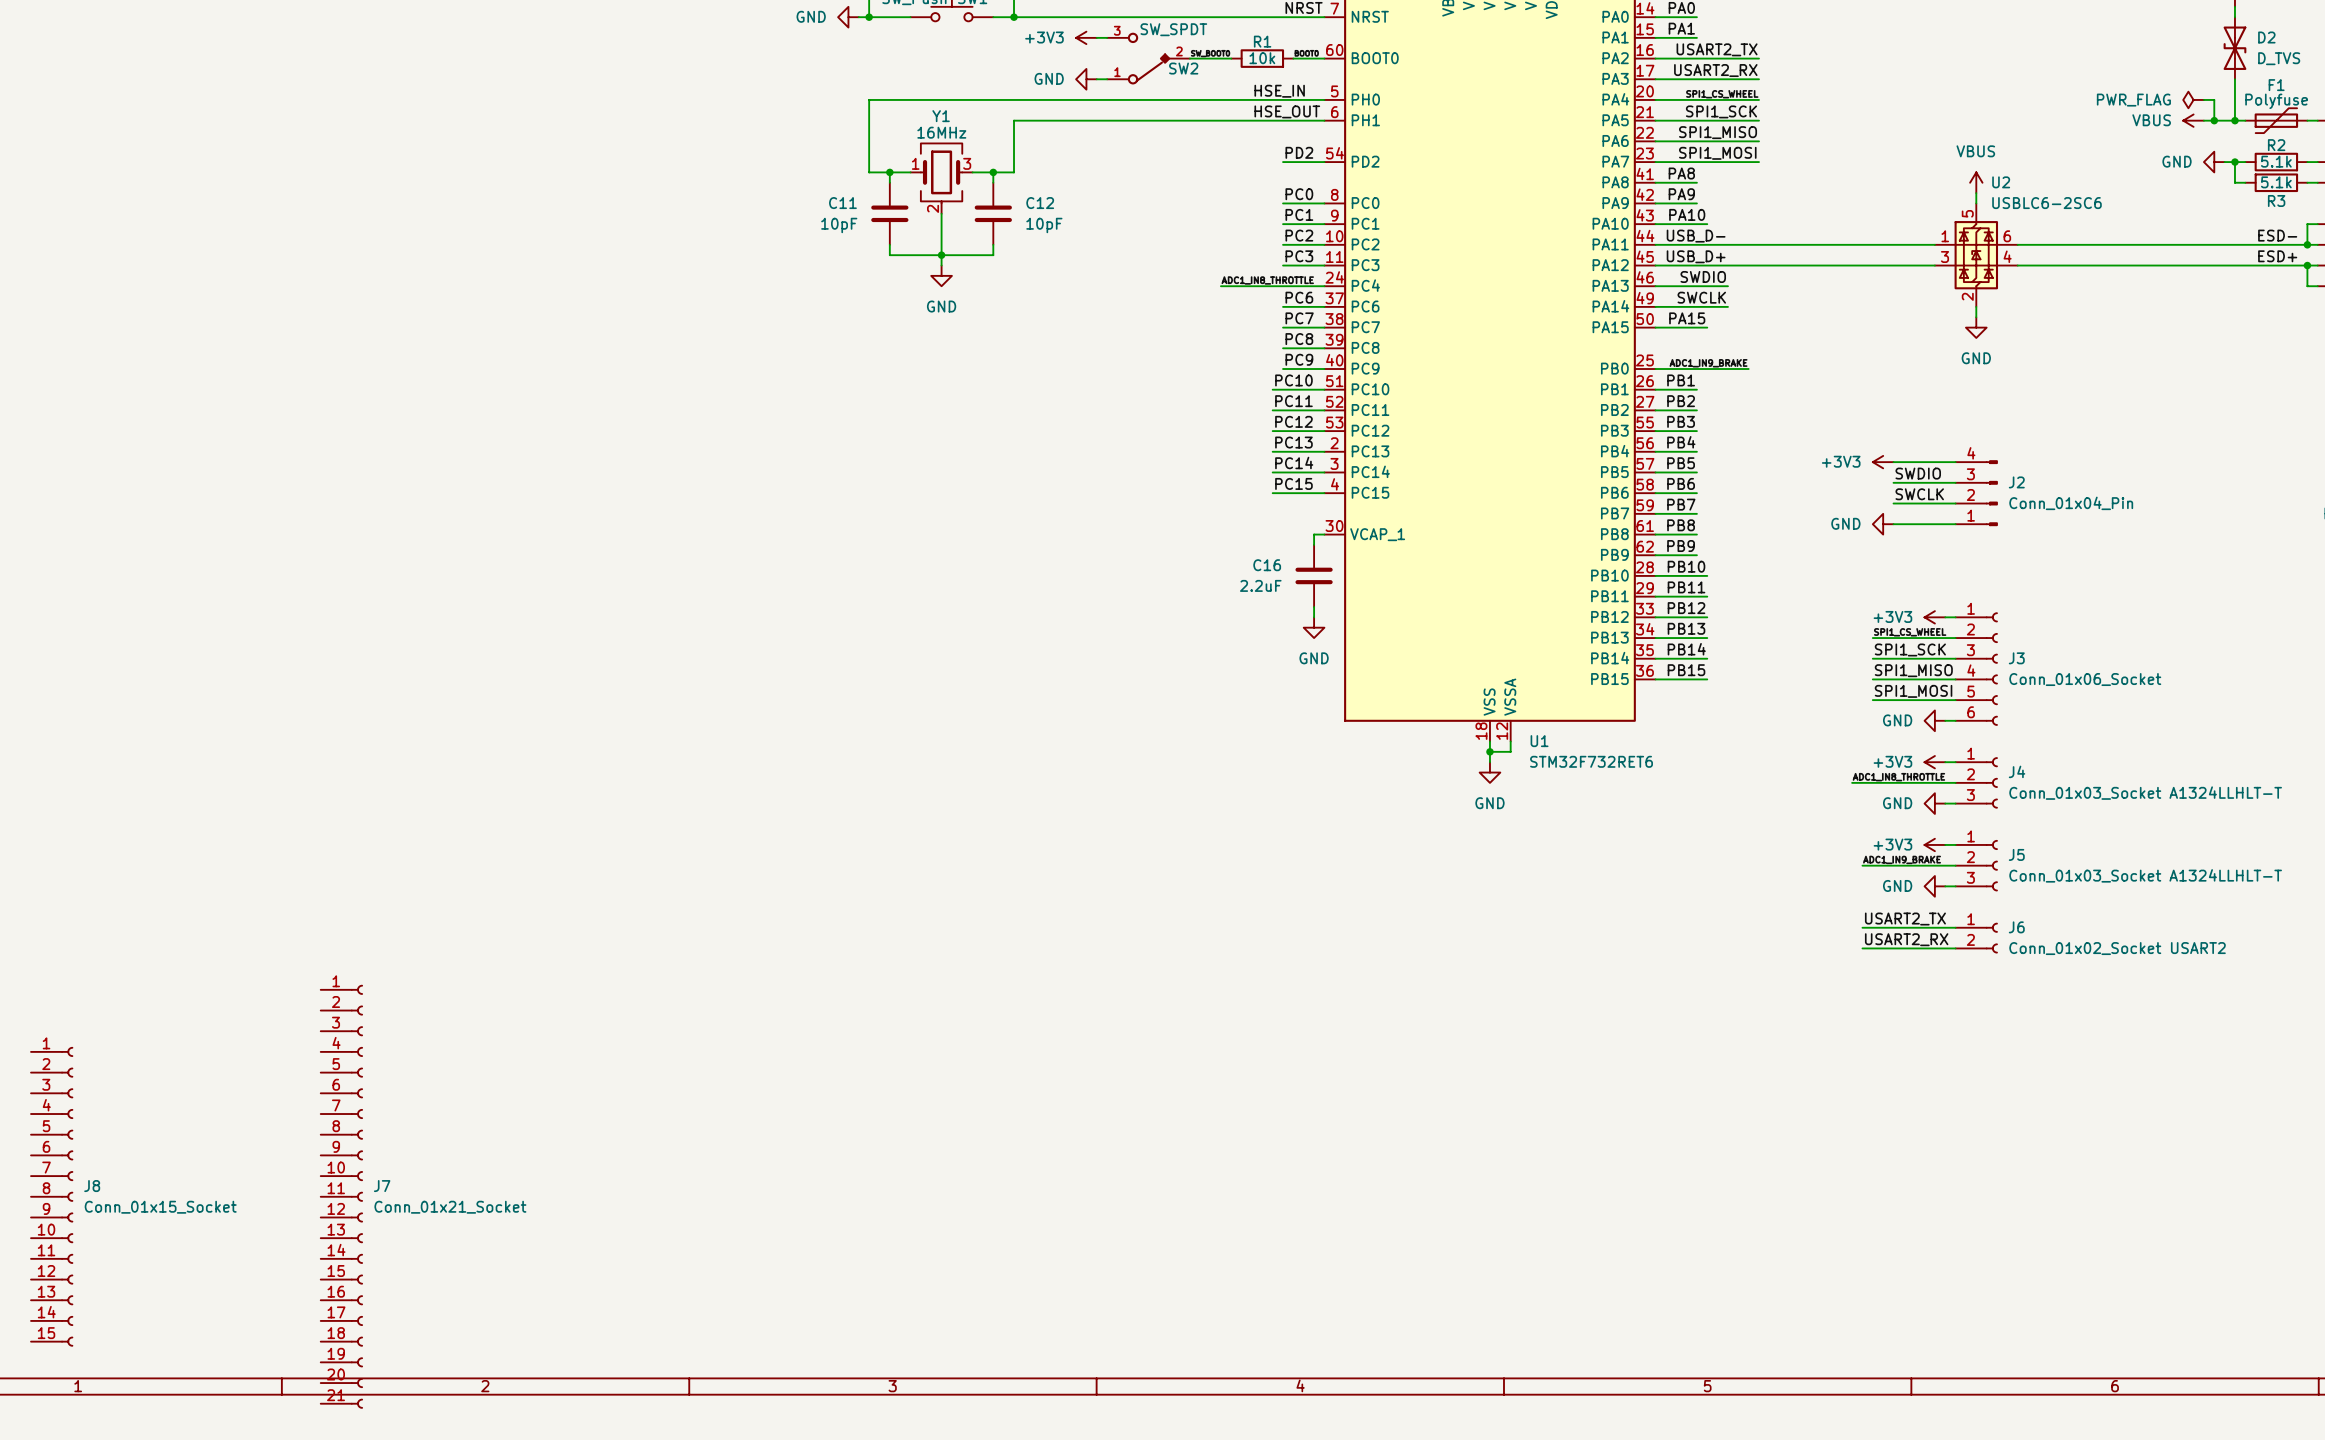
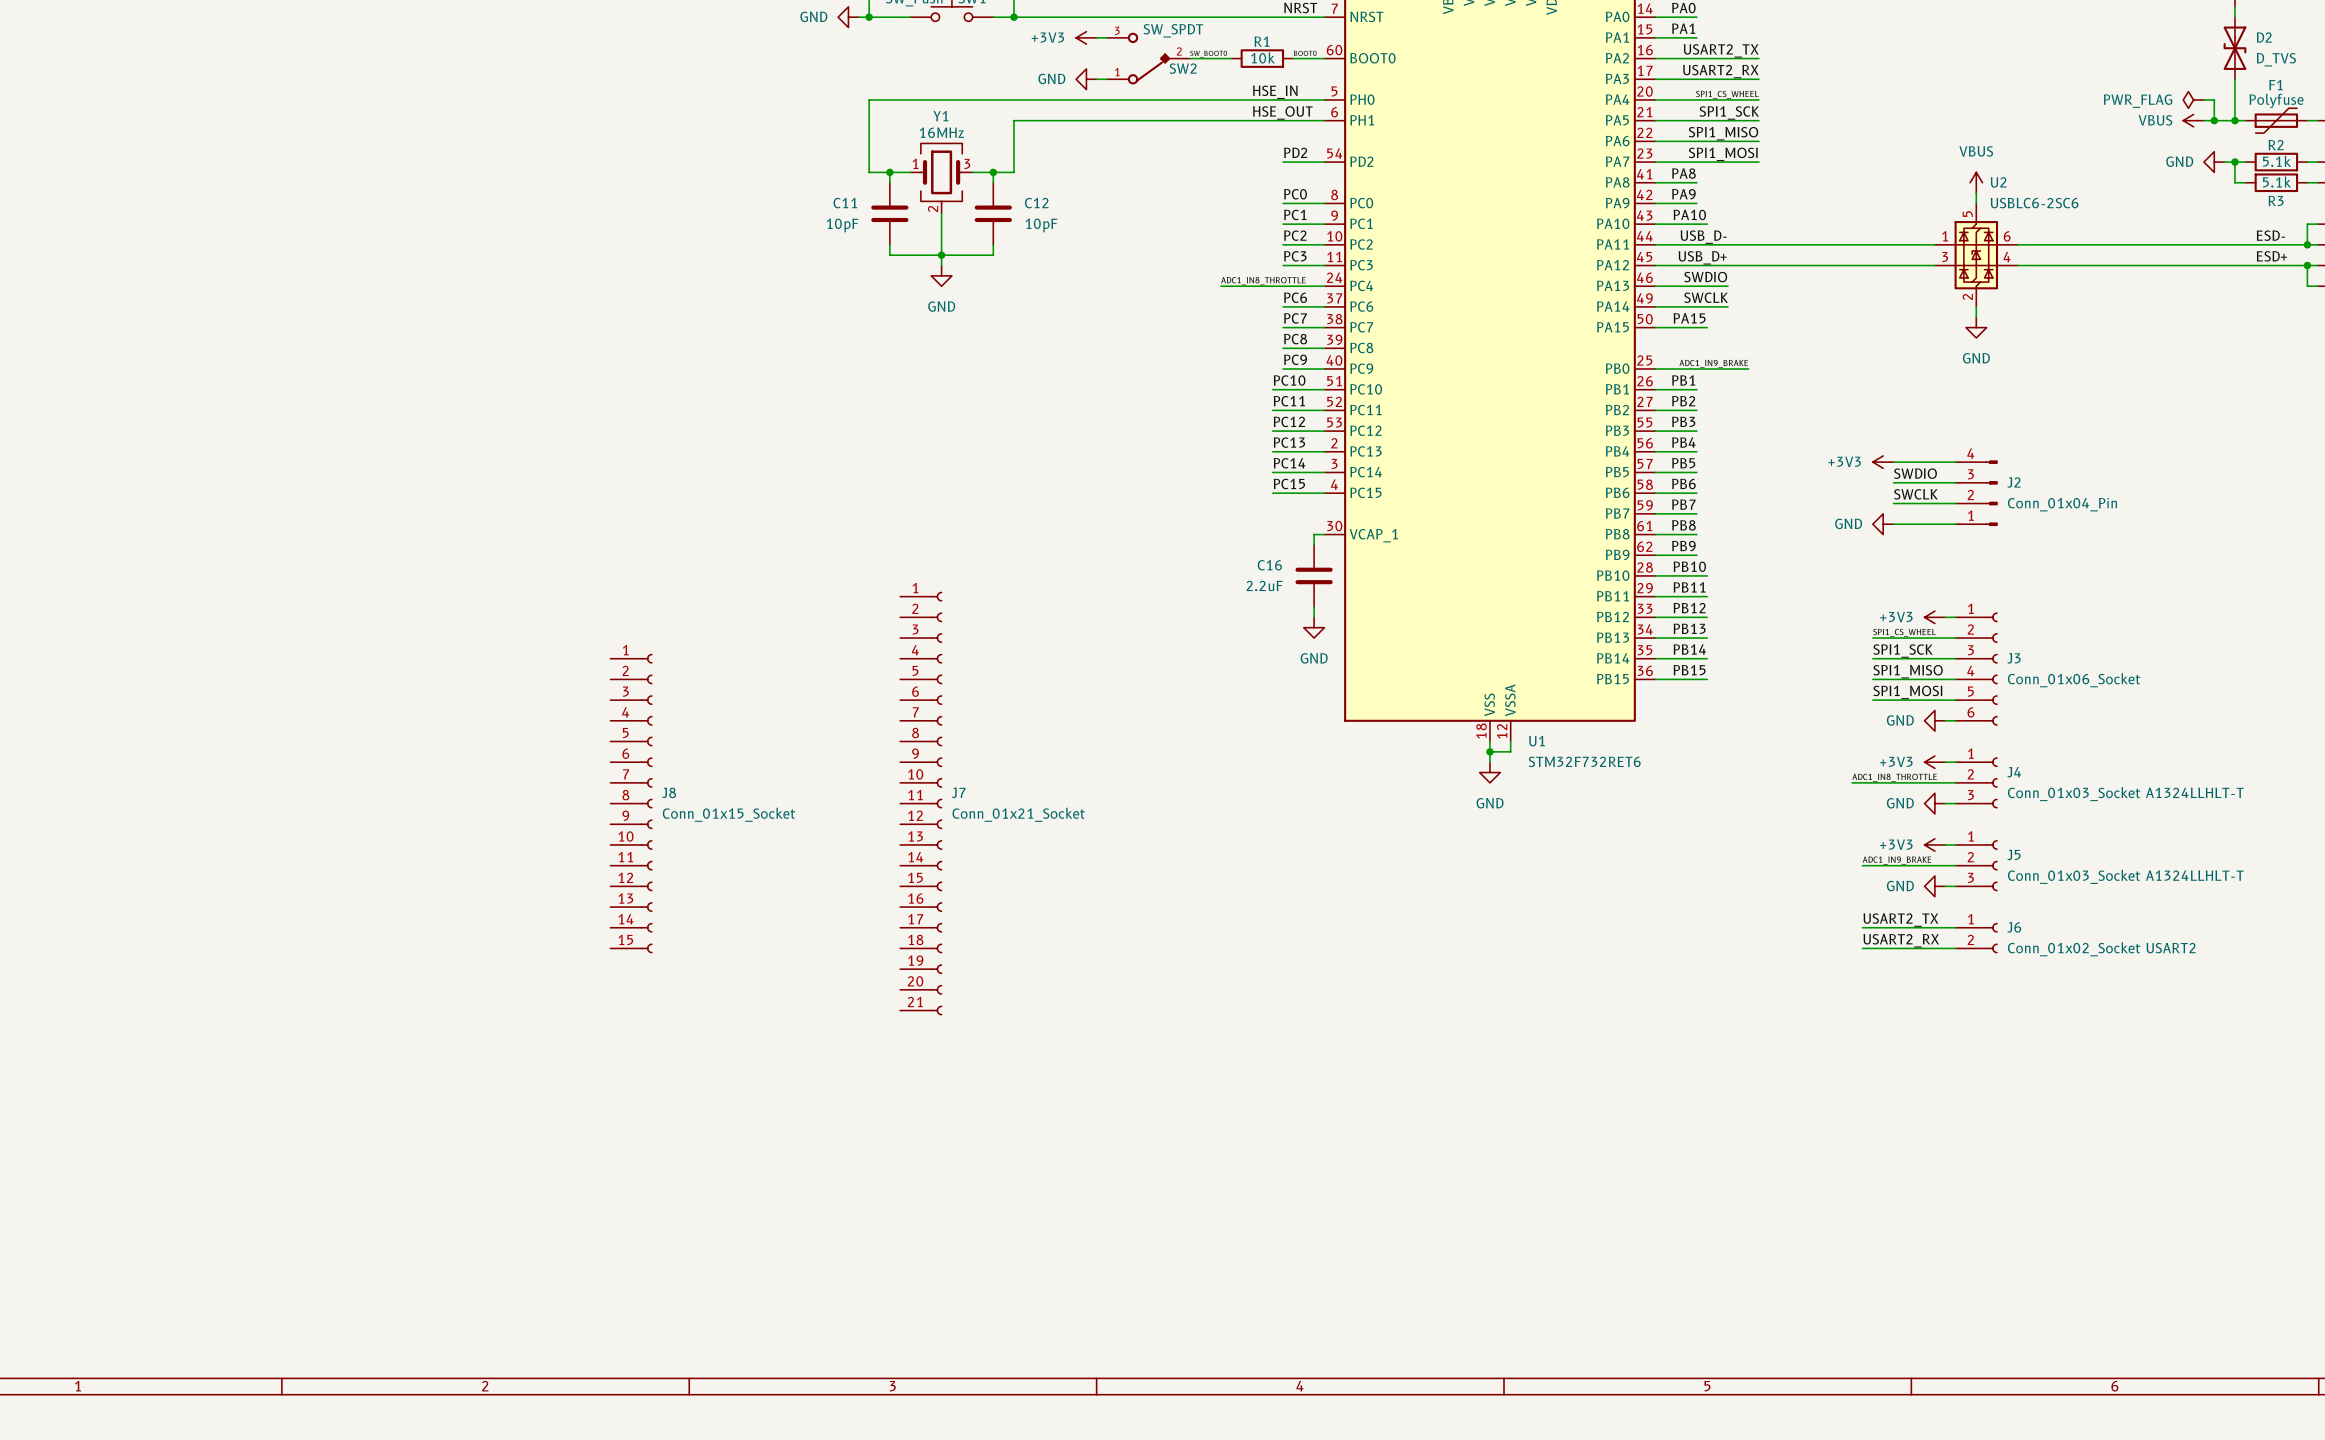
J8 position: (52, 1196) -> (631, 803)
J7 position: (341, 1196) -> (921, 803)

